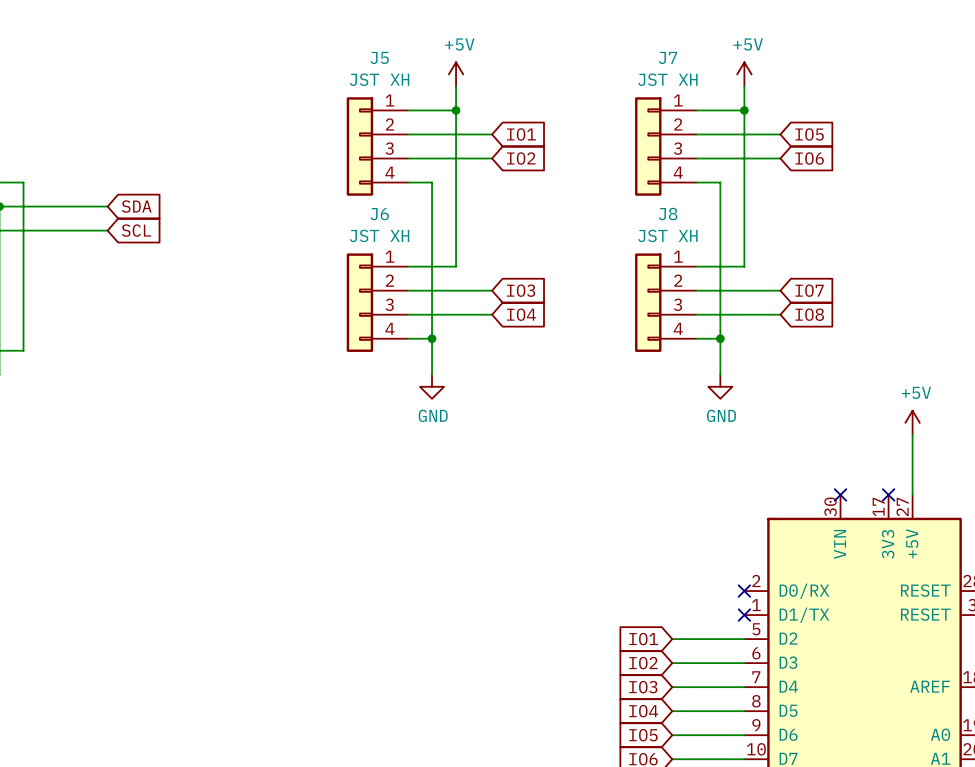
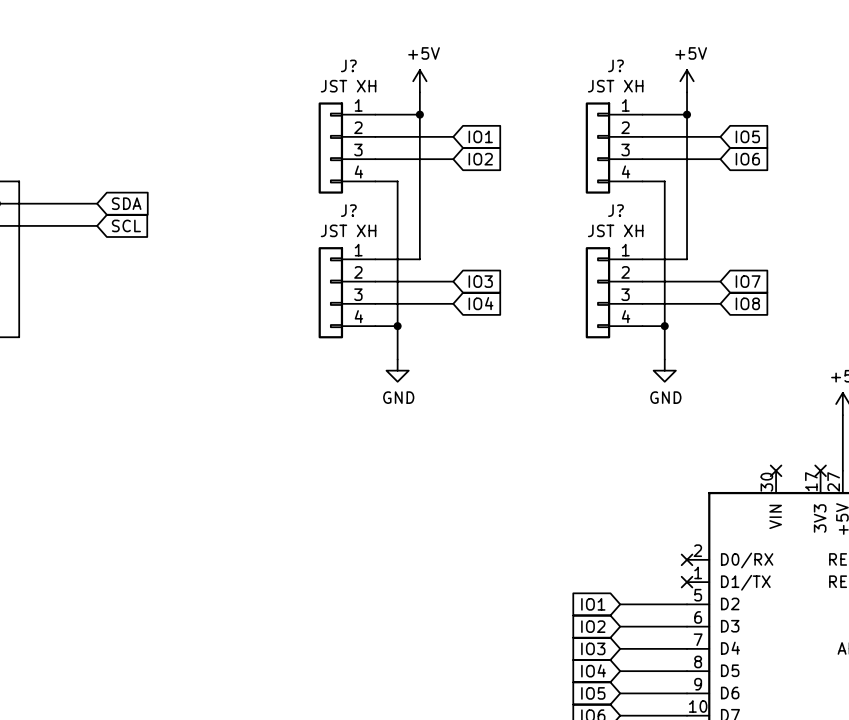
J5 name: J5 (379, 57) -> J? (348, 65)
J7 name: J7 (668, 57) -> J? (615, 65)
J6 name: J6 (379, 214) -> J? (348, 210)
J8 name: J8 (668, 214) -> J? (615, 210)

